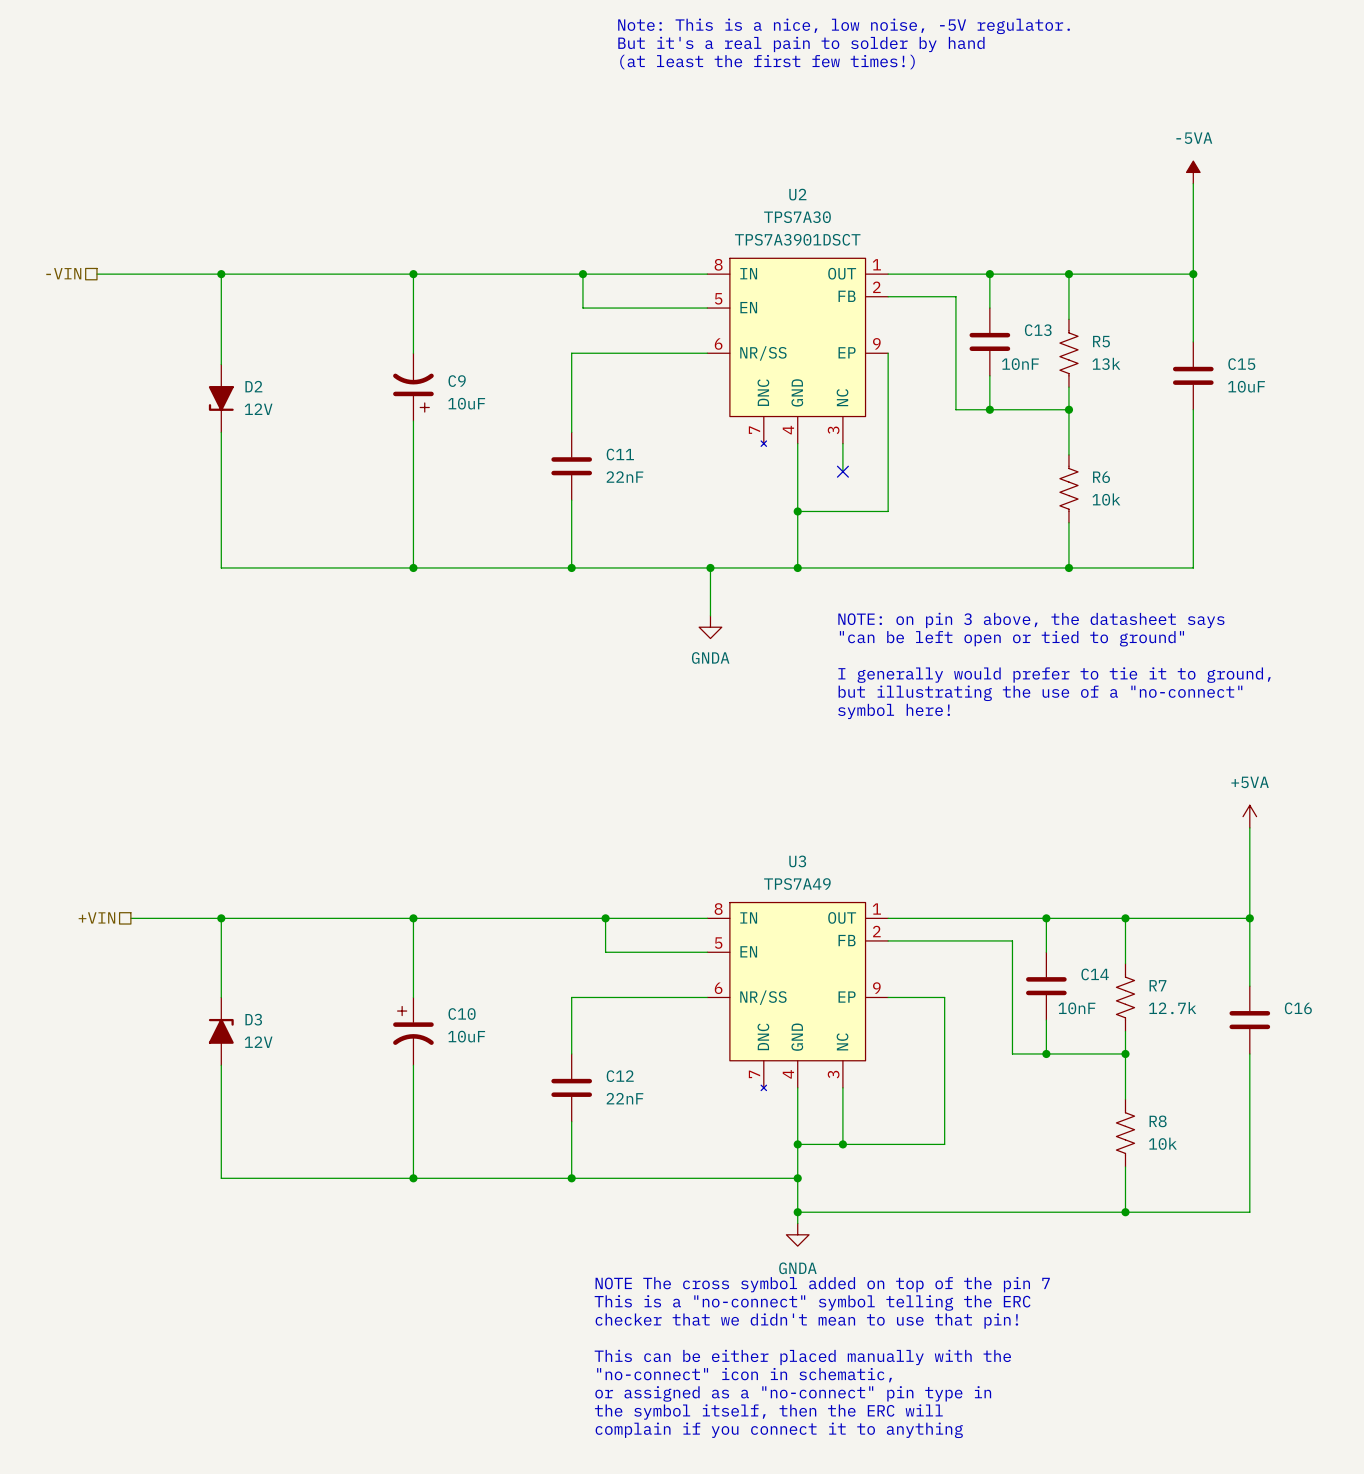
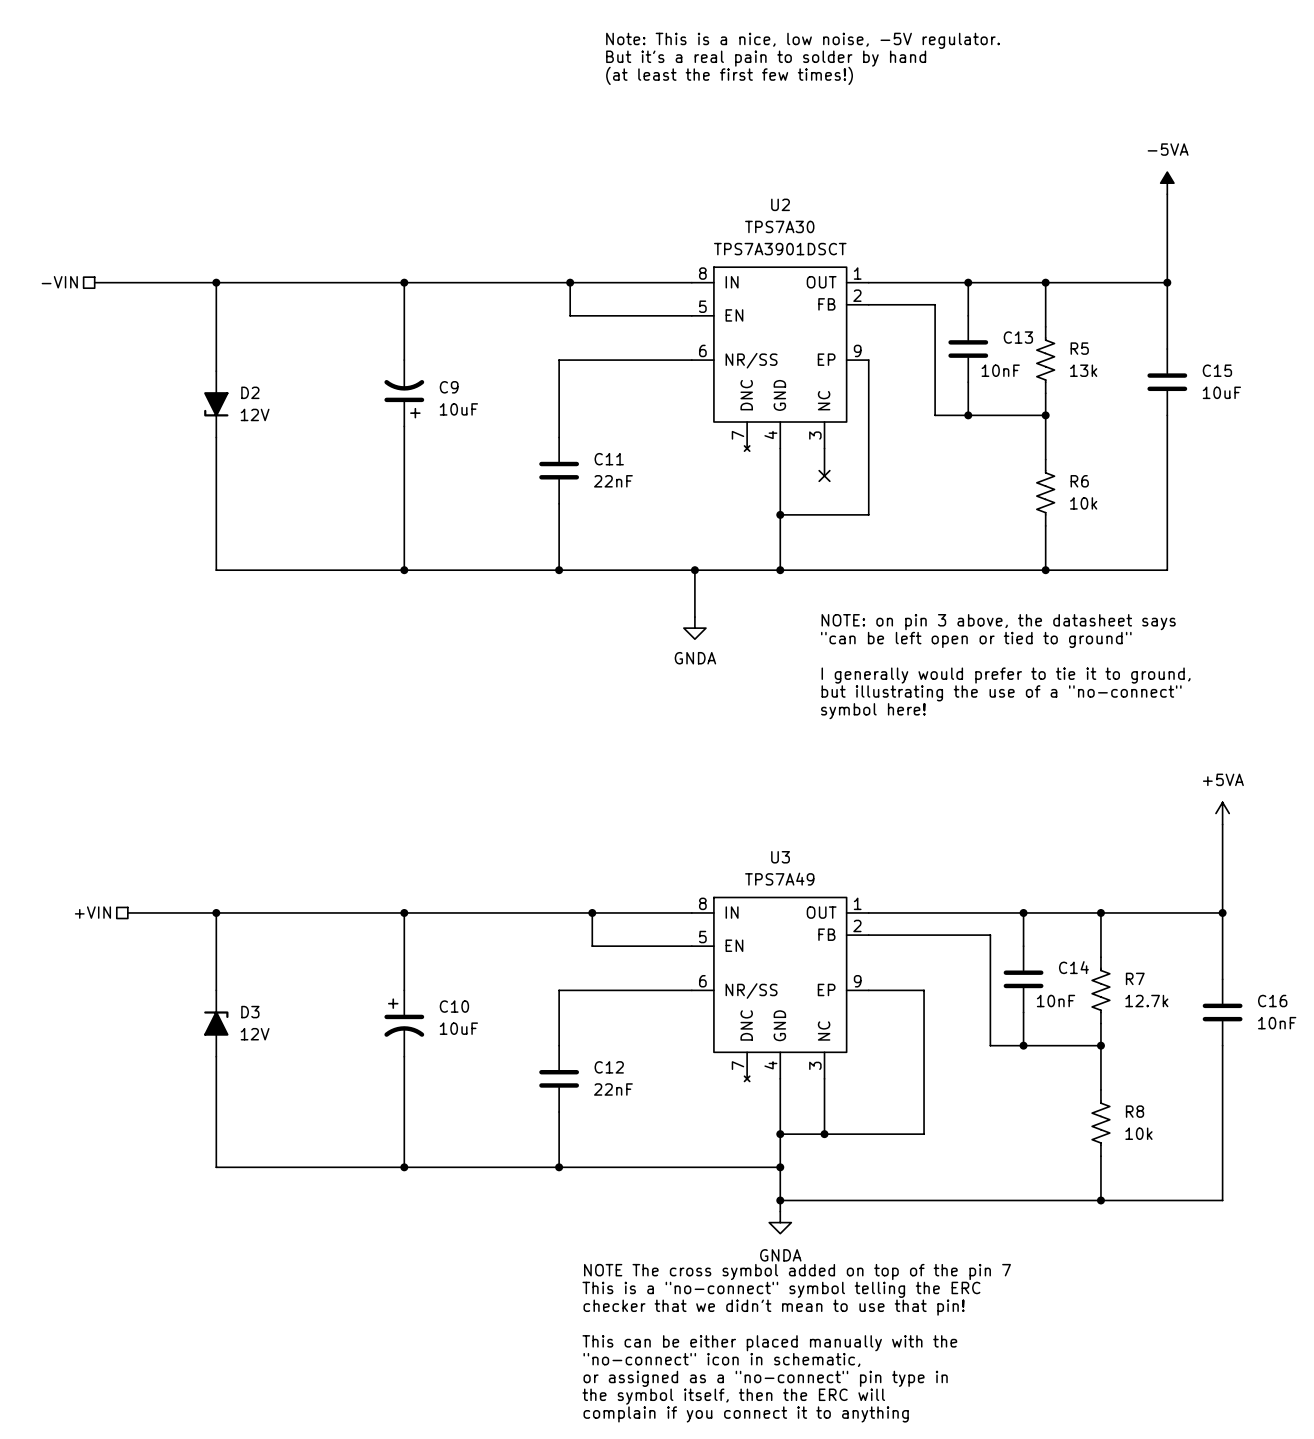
C16 value: none -> 10nF (1277, 1023)

